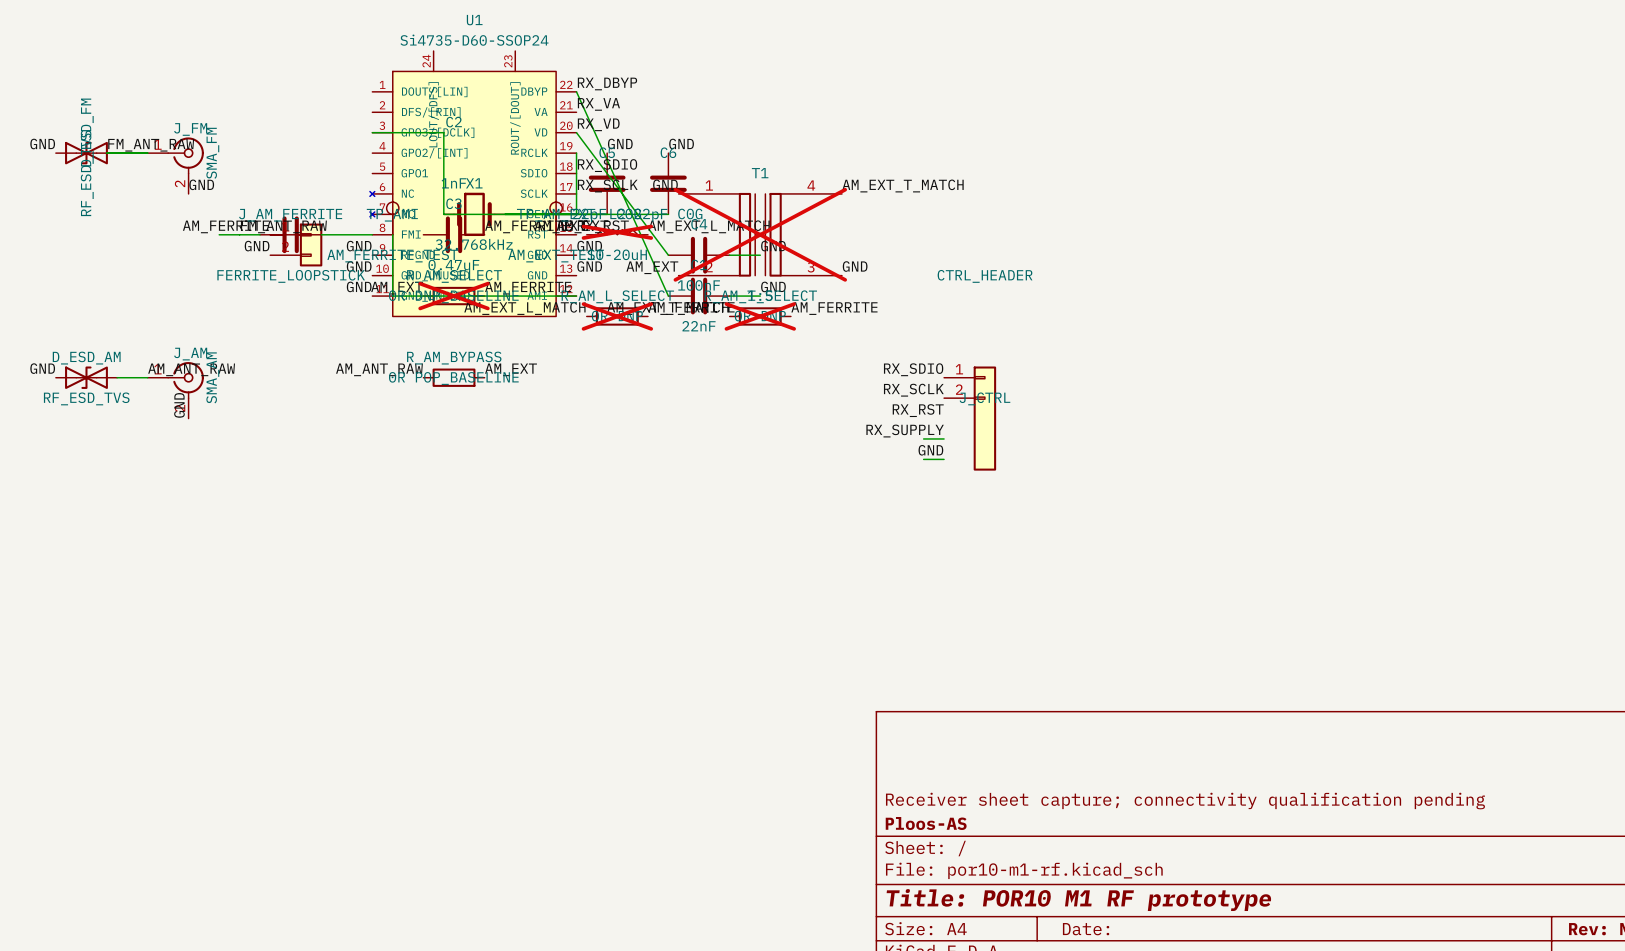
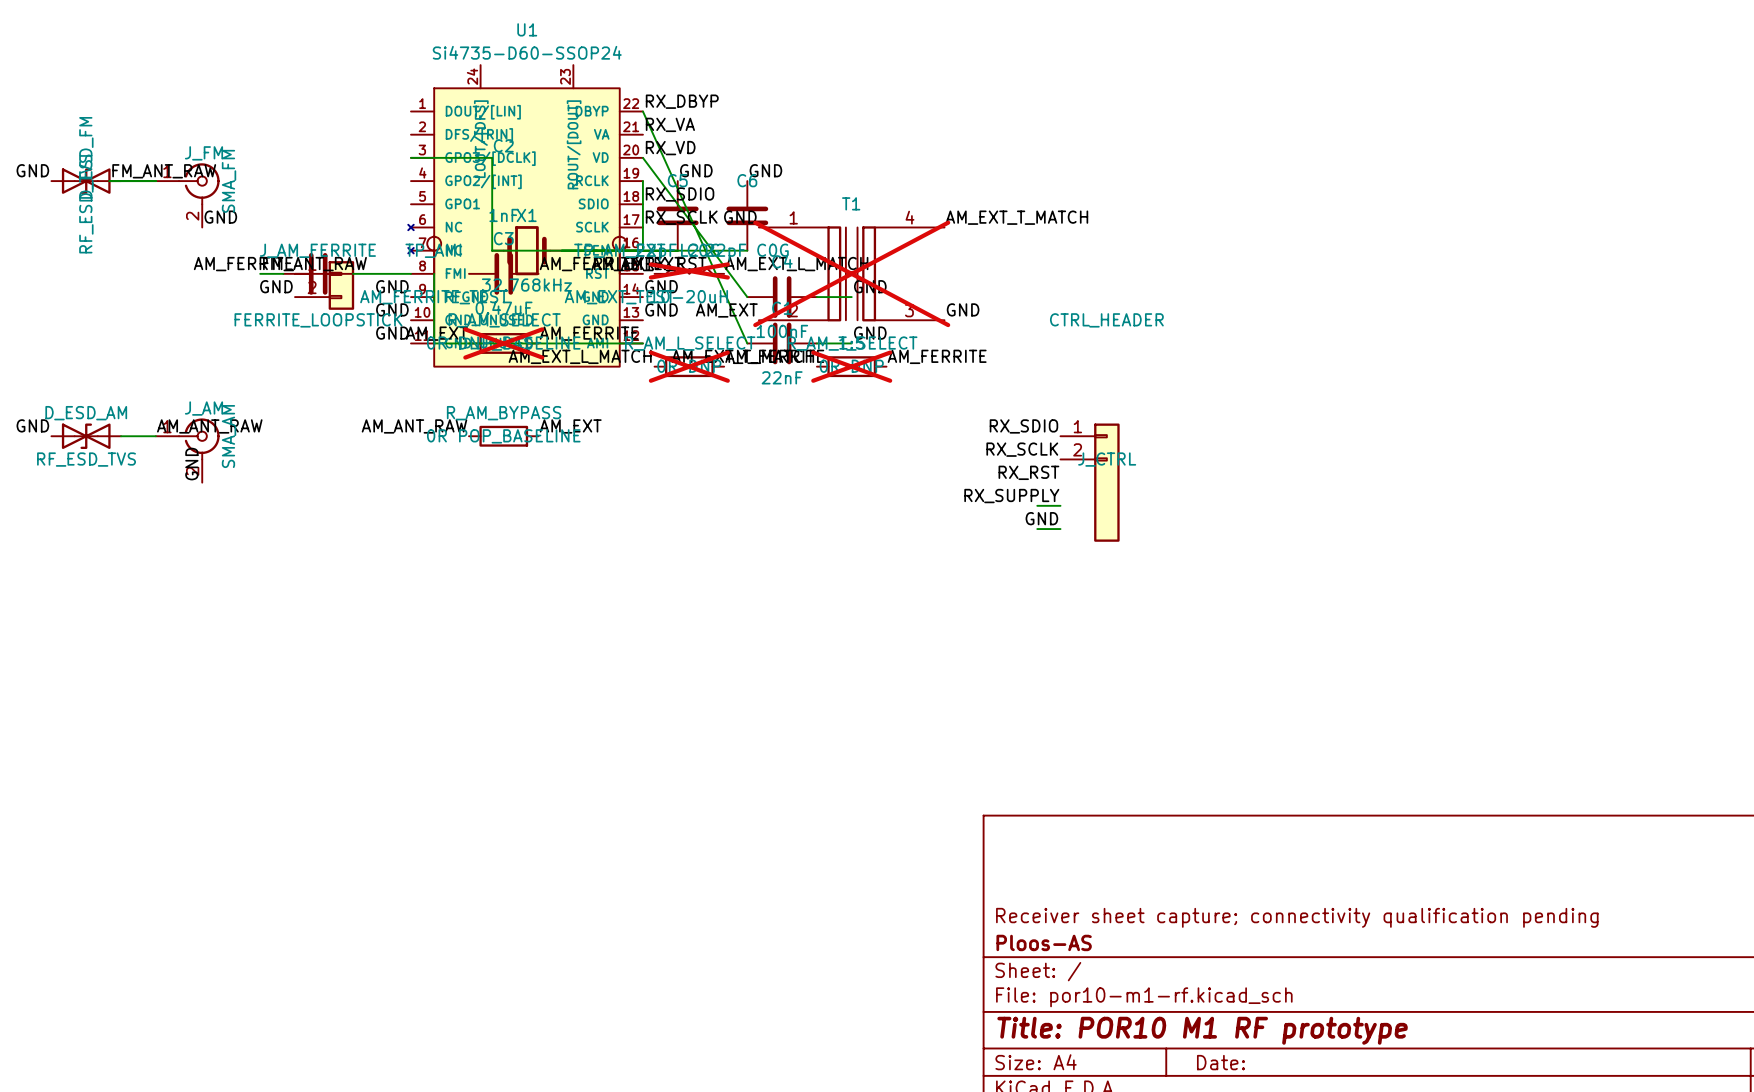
wire: (219, 234) (239, 234) -> none

